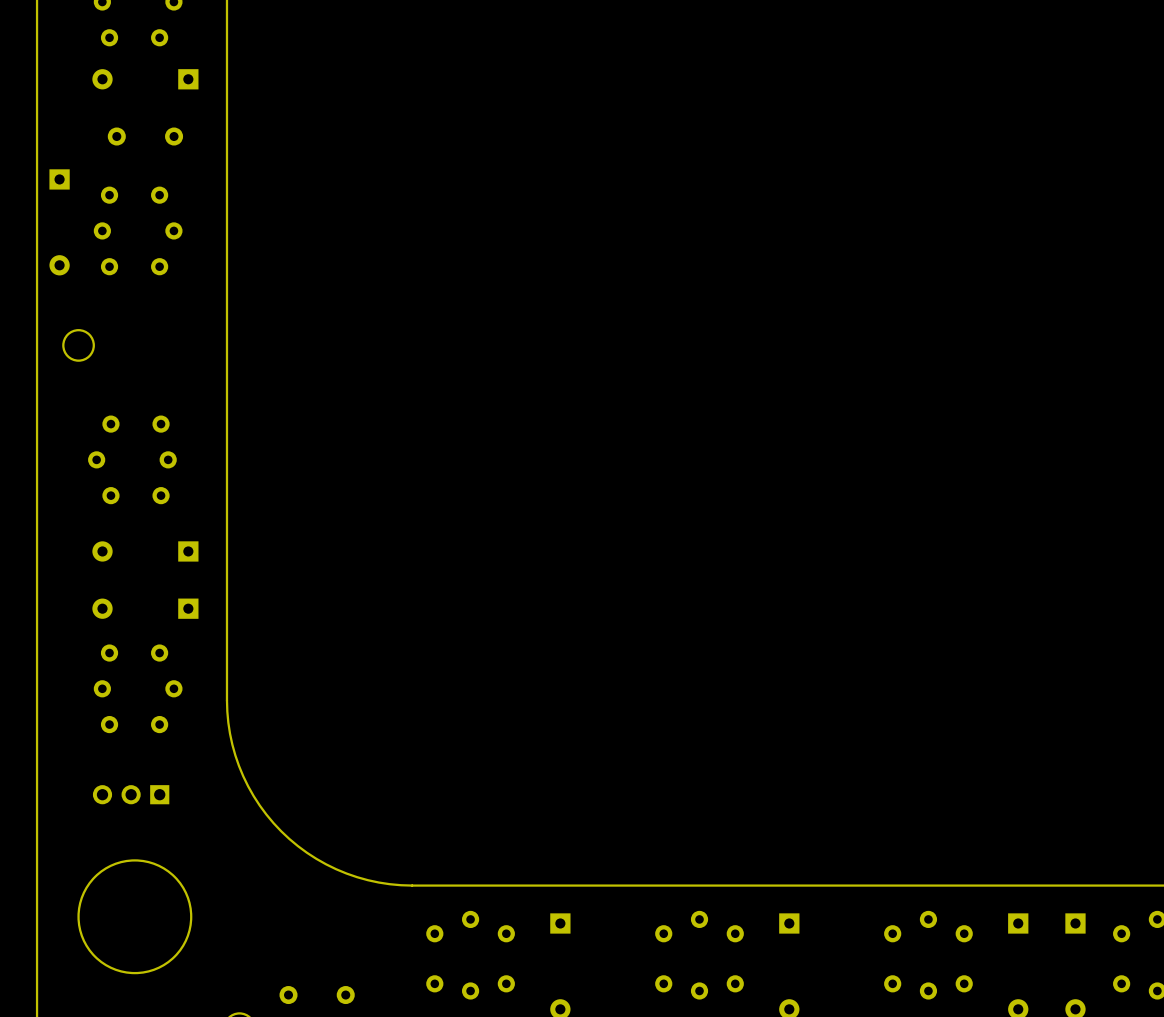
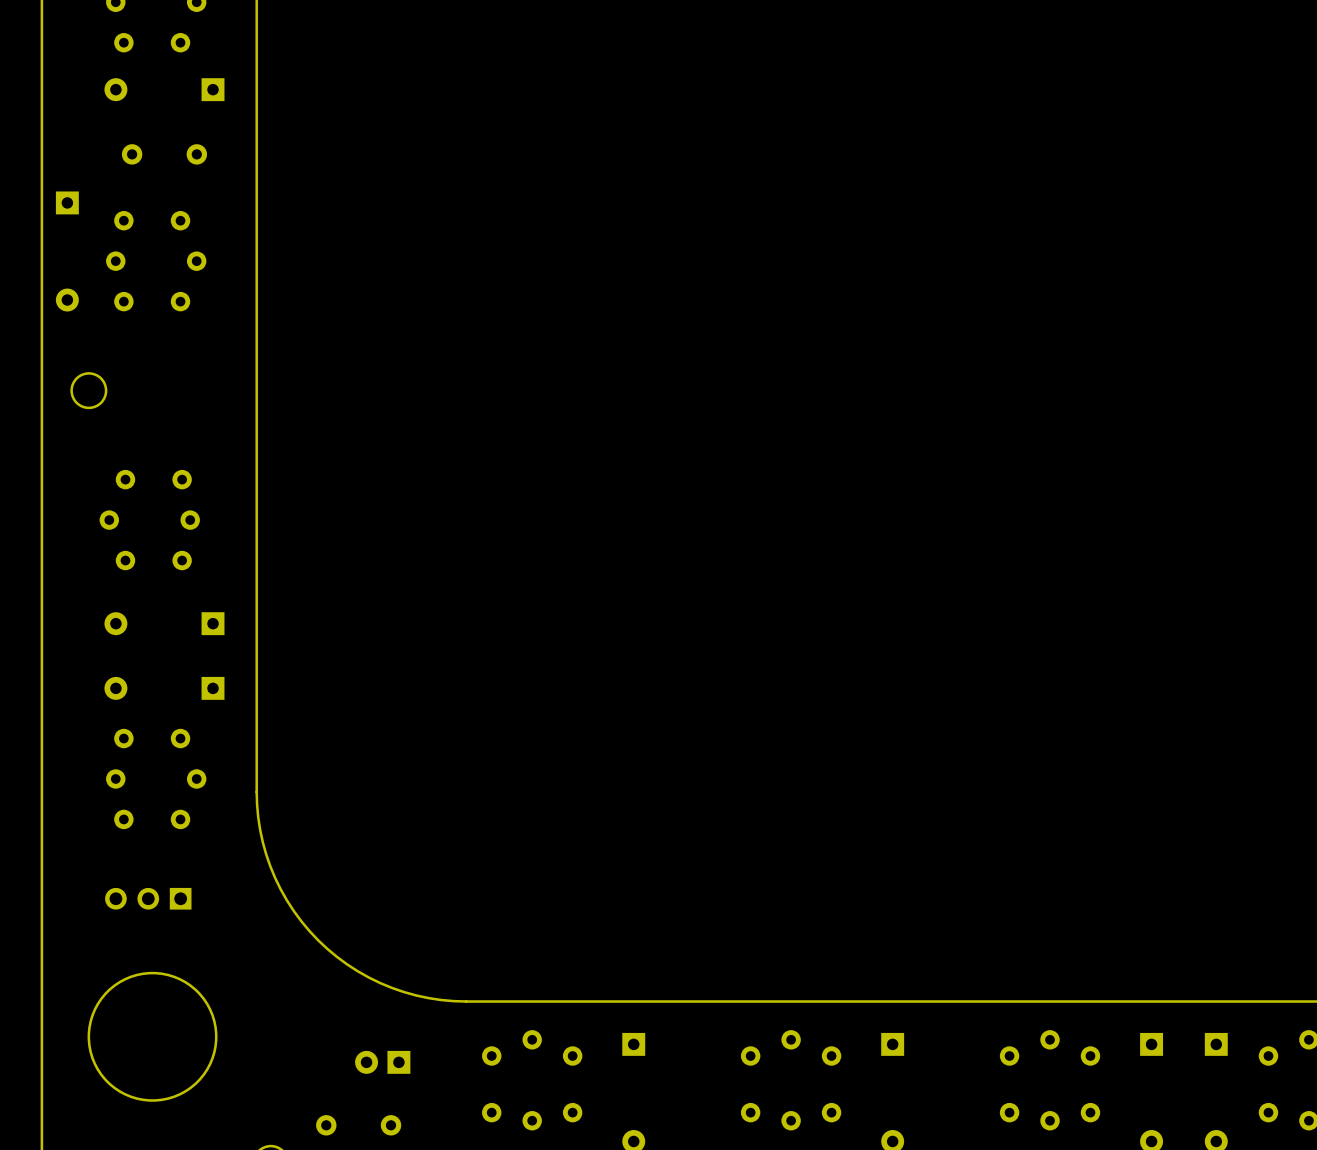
part: none -> (382, 1062)

